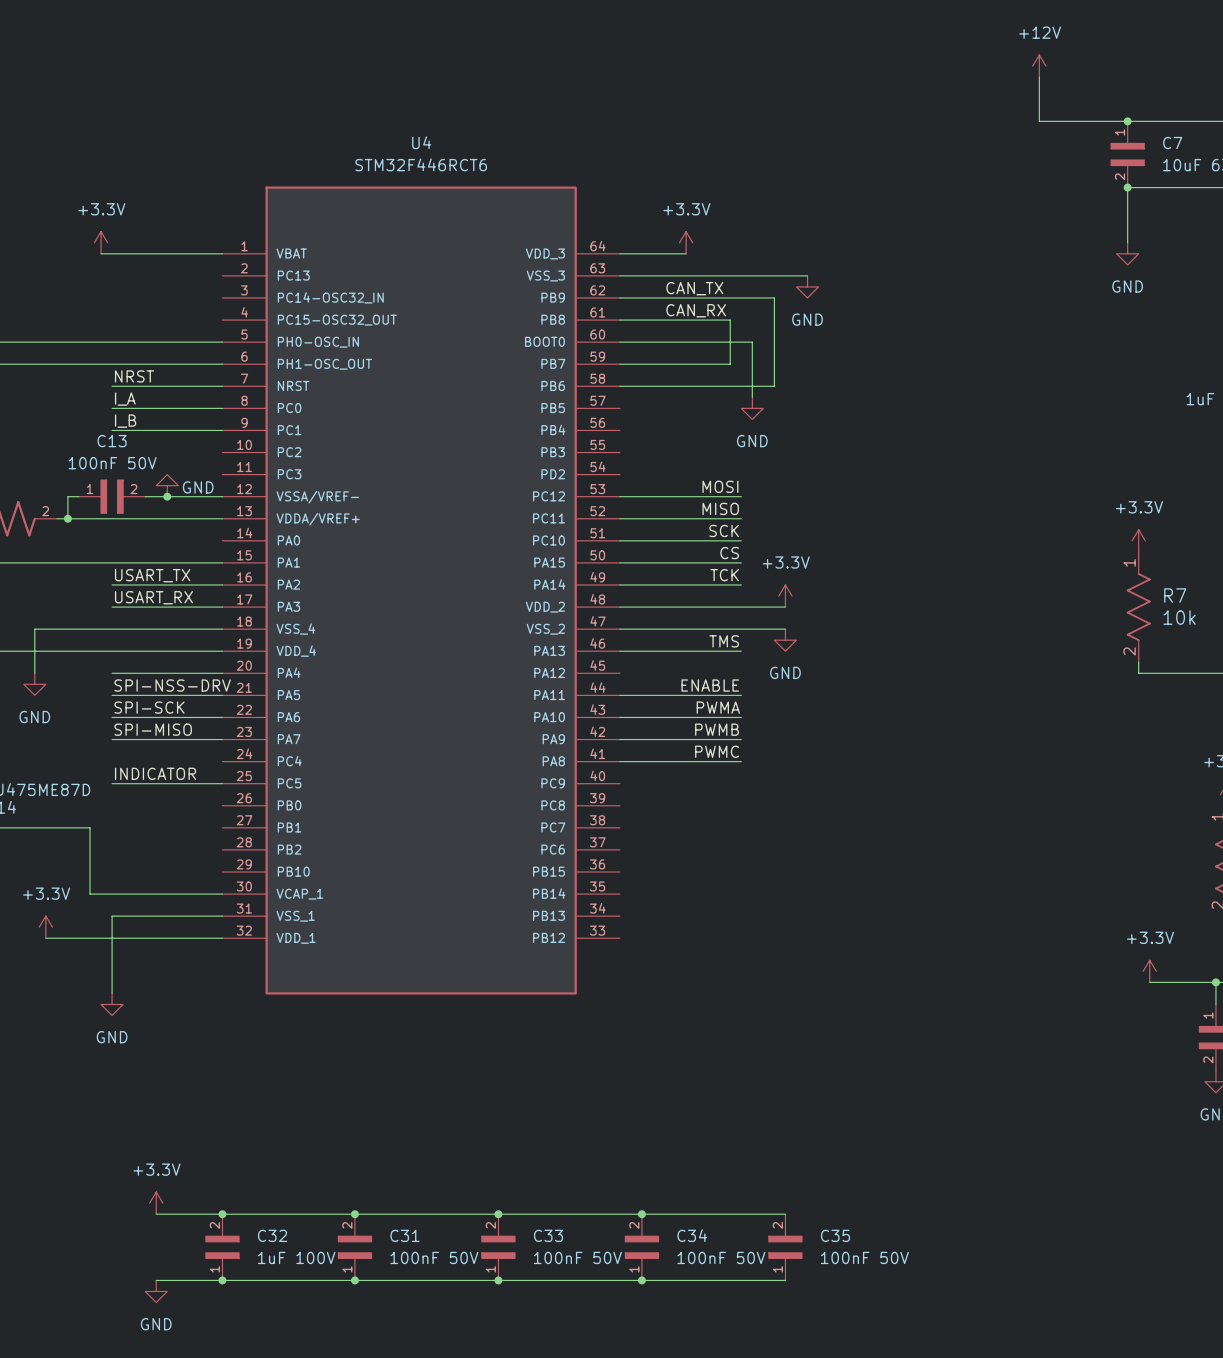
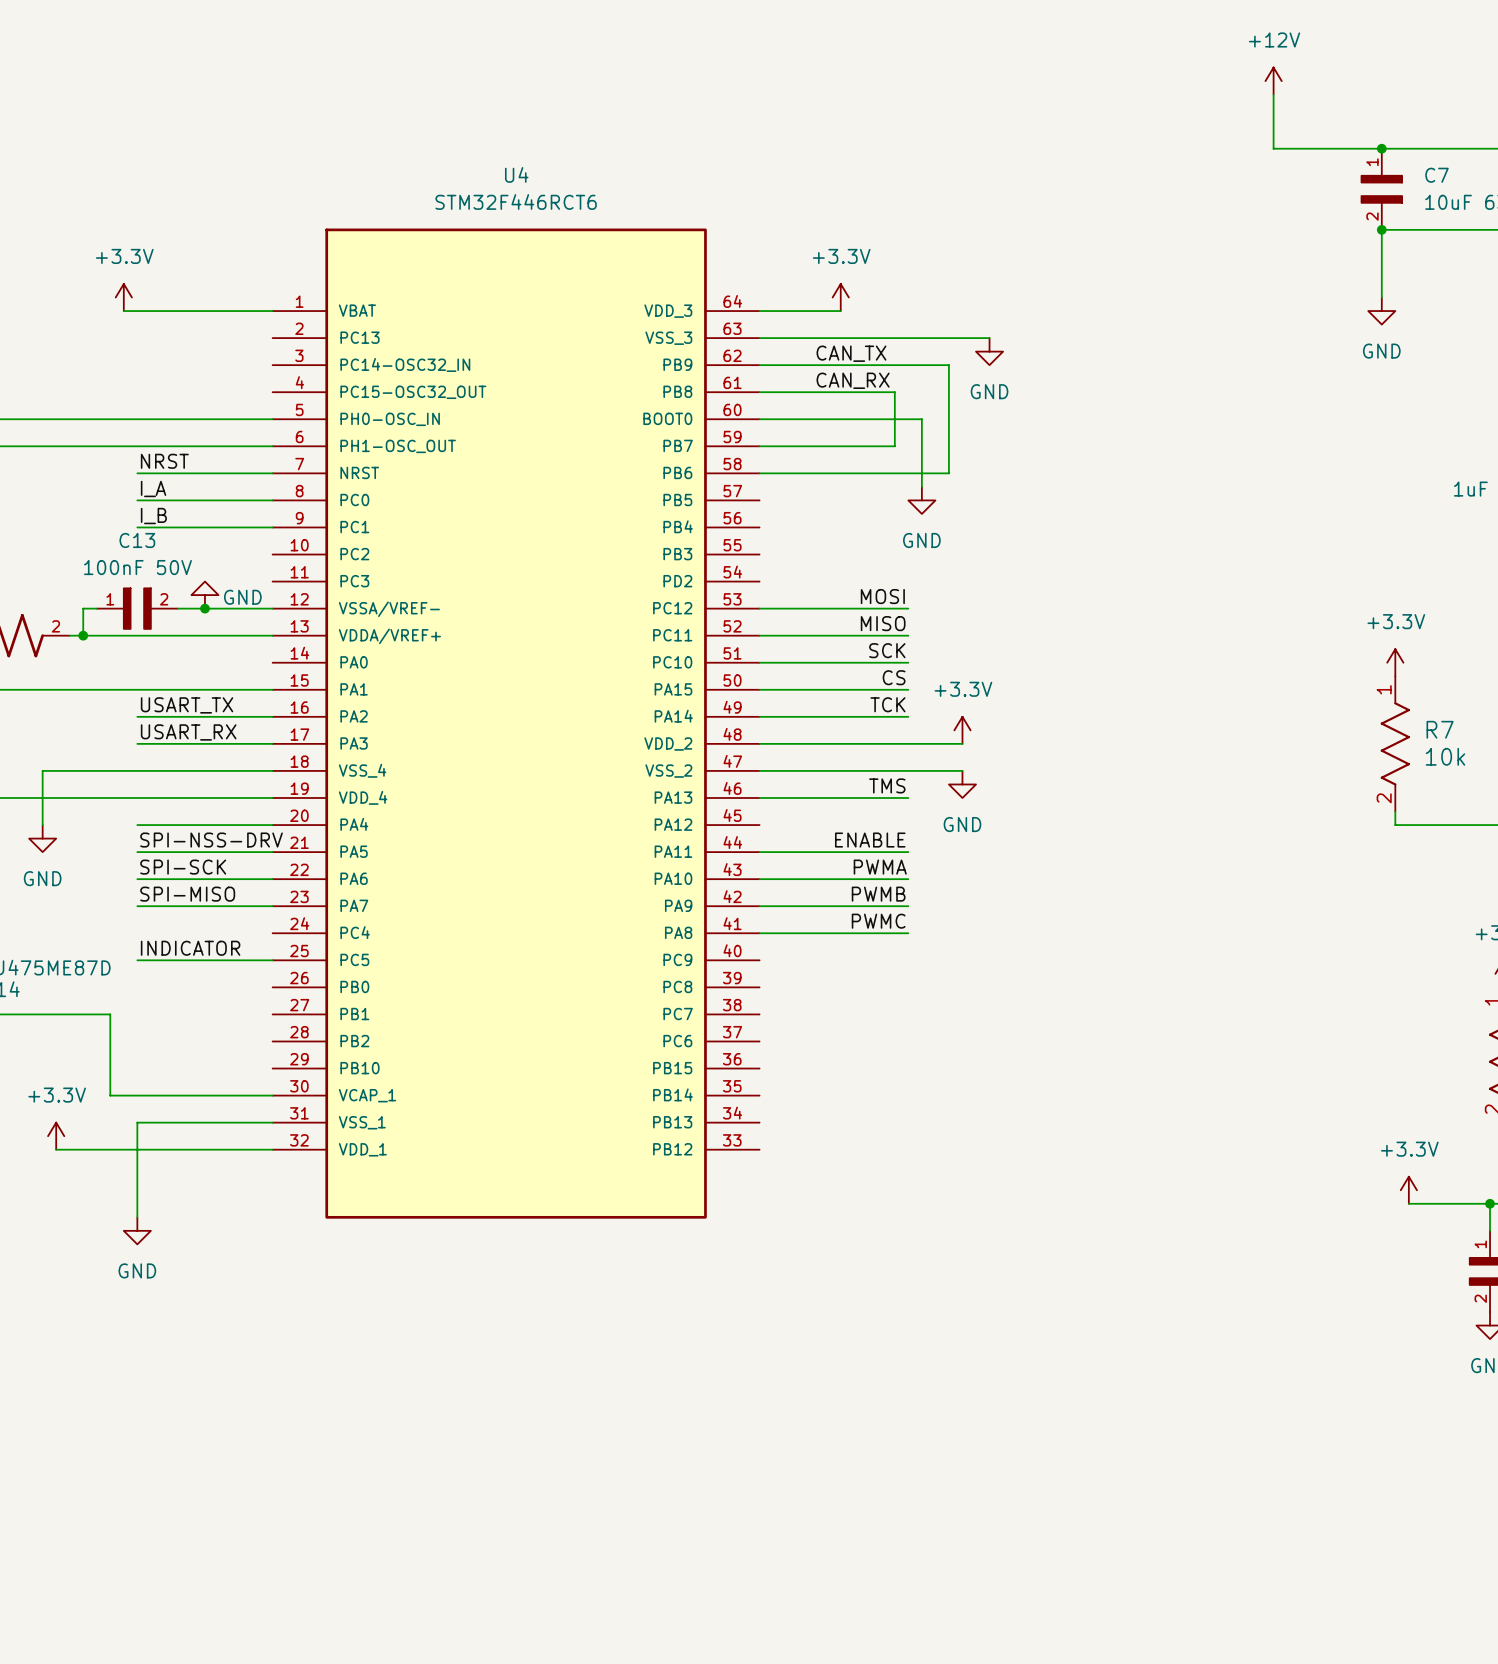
power symbol: +3.3V (156, 1203) -> none
wire: (156, 1214) (785, 1214) -> none
junction: (222, 1214) -> none
junction: (354, 1214) -> none
junction: (498, 1214) -> none
junction: (641, 1214) -> none
C32: 1uF 100V (222, 1247) -> none
C31: 100nF 50V (354, 1247) -> none
C33: 100nF 50V (498, 1247) -> none
C34: 100nF 50V (641, 1247) -> none
C35: 100nF 50V (785, 1247) -> none
wire: (156, 1280) (785, 1280) -> none
junction: (222, 1280) -> none
junction: (354, 1280) -> none
junction: (498, 1280) -> none
junction: (641, 1280) -> none
power symbol: GND (156, 1291) -> none

